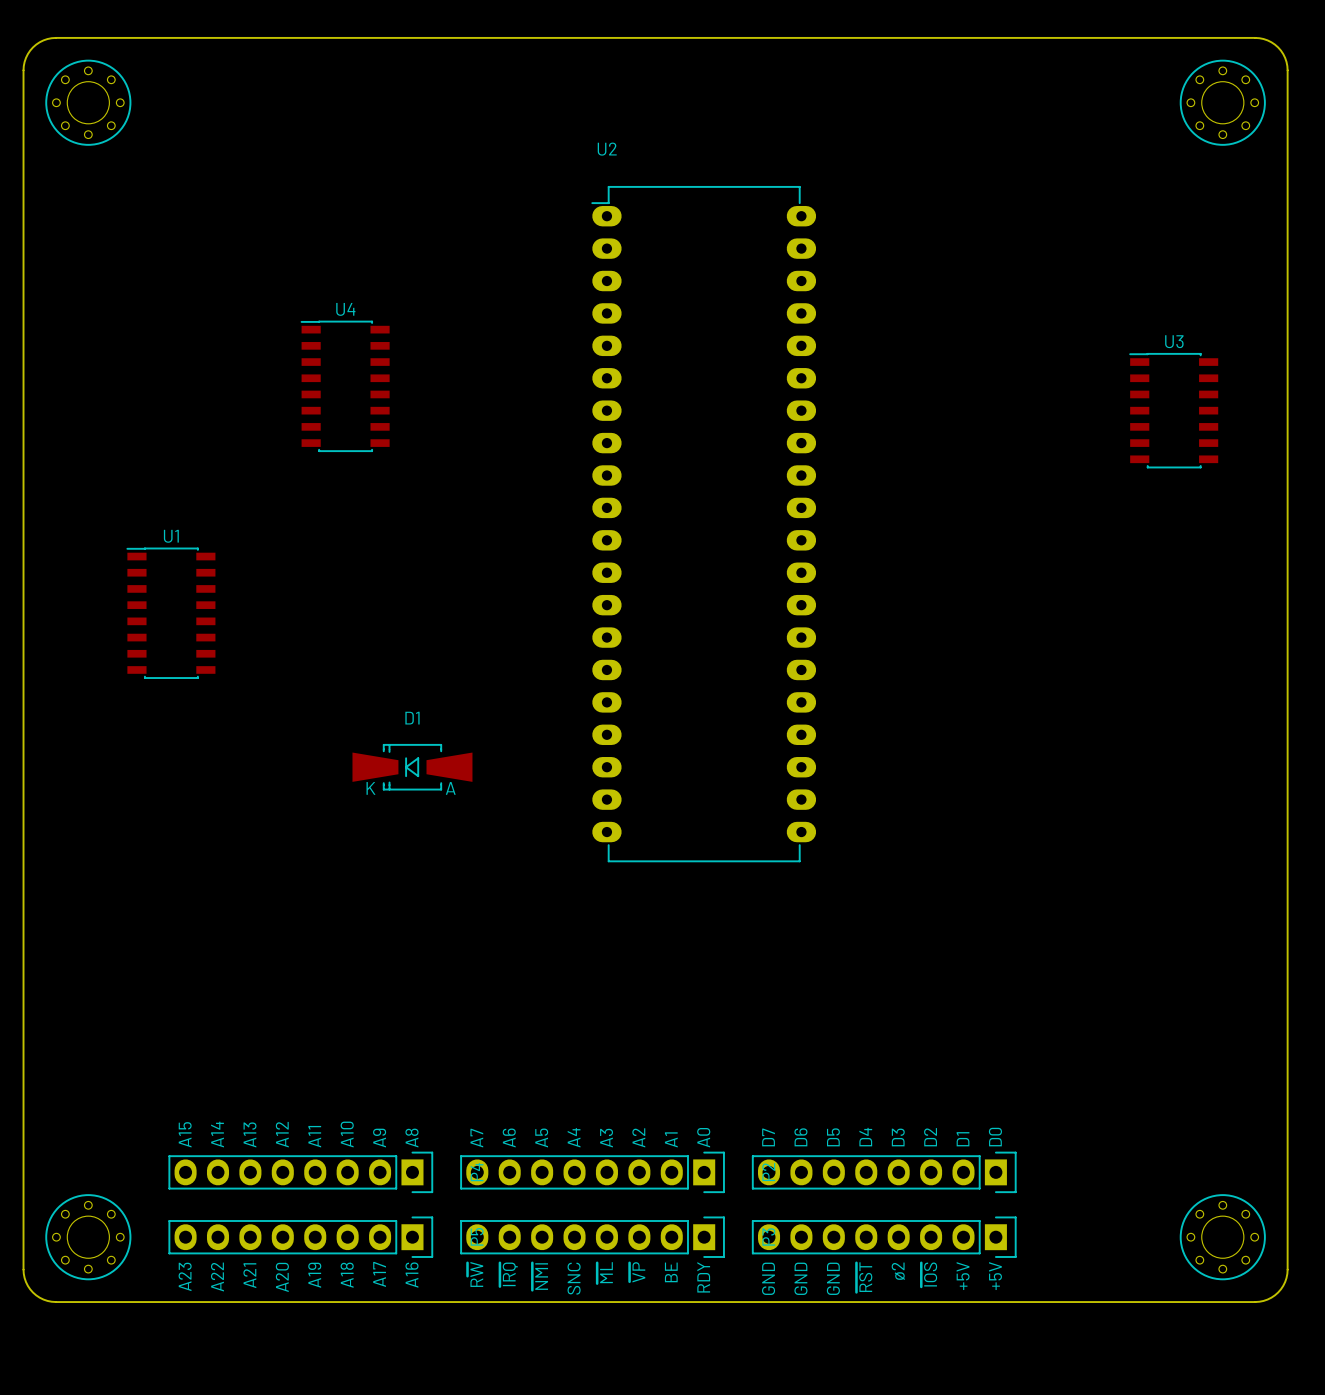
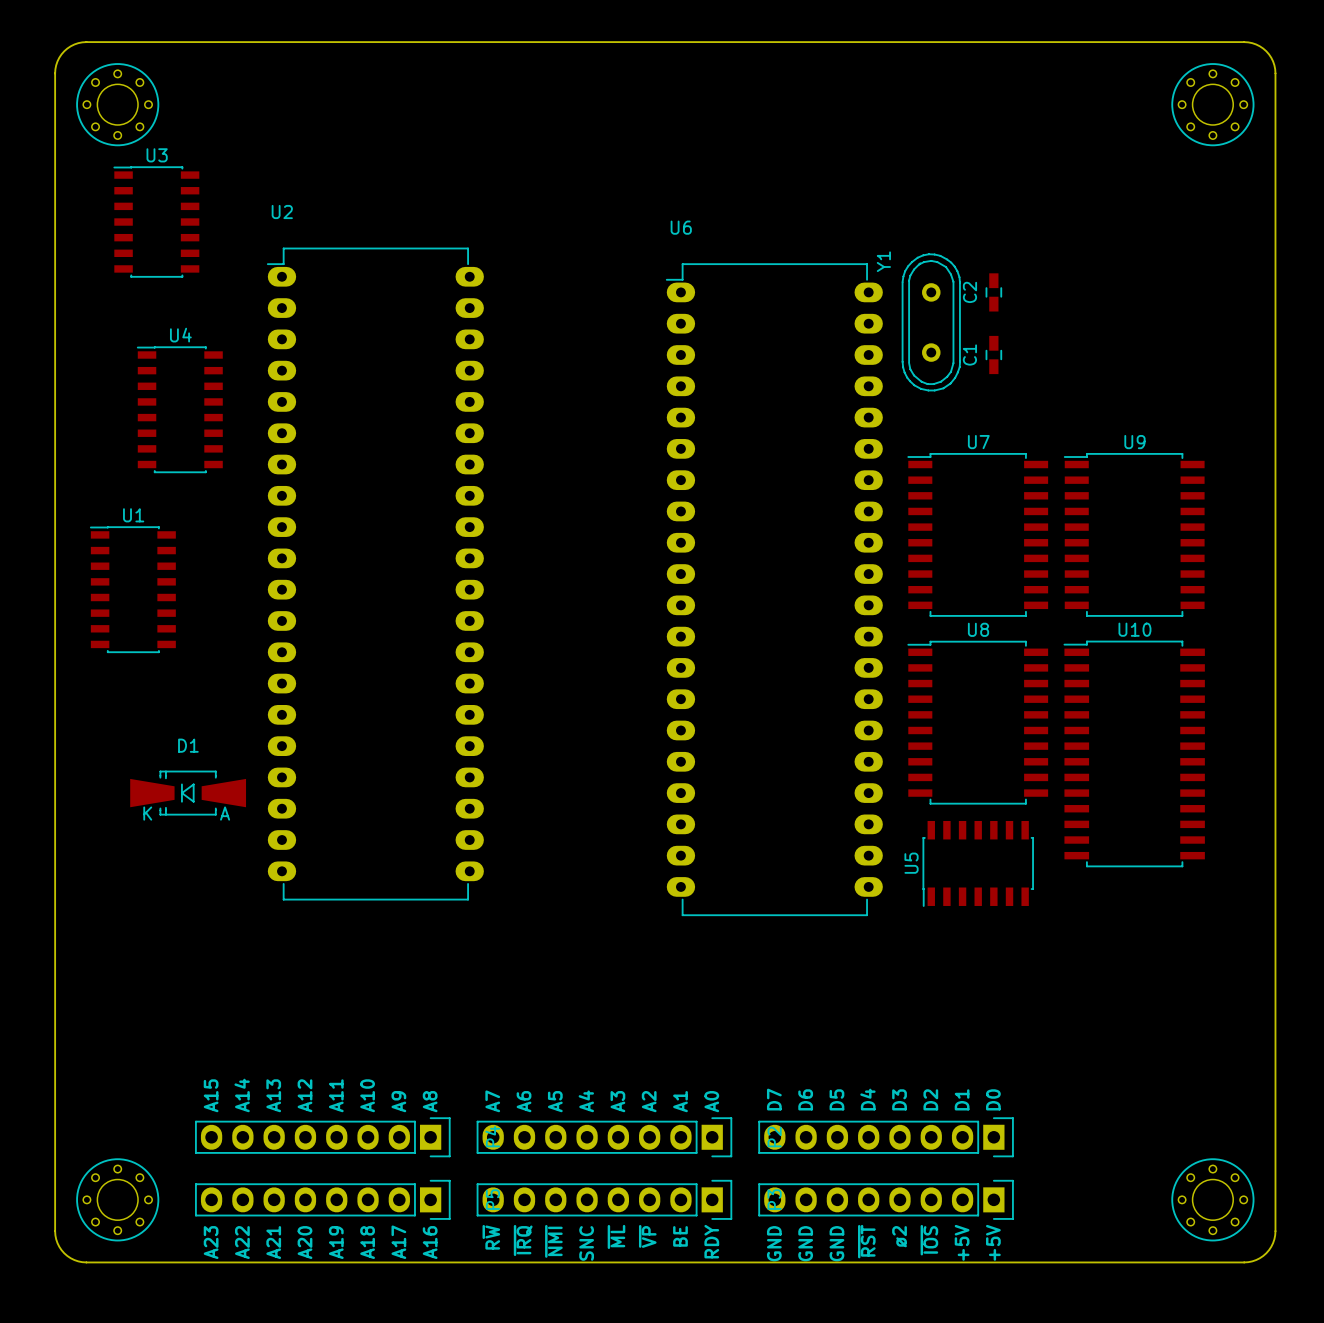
C2: none -> (993, 292)
Y1: none -> (931, 322)
C1: none -> (993, 355)
U4 position: (345, 386) -> (179, 409)
U3 position: (1173, 410) -> (156, 222)
U2 position: (703, 524) -> (375, 574)
U7: none -> (977, 534)
U9: none -> (1134, 534)
U6: none -> (774, 589)
U1 position: (170, 613) -> (132, 589)
U8: none -> (977, 722)
D1 position: (412, 767) -> (188, 793)
U10: none -> (1134, 753)
U5: none -> (978, 863)

